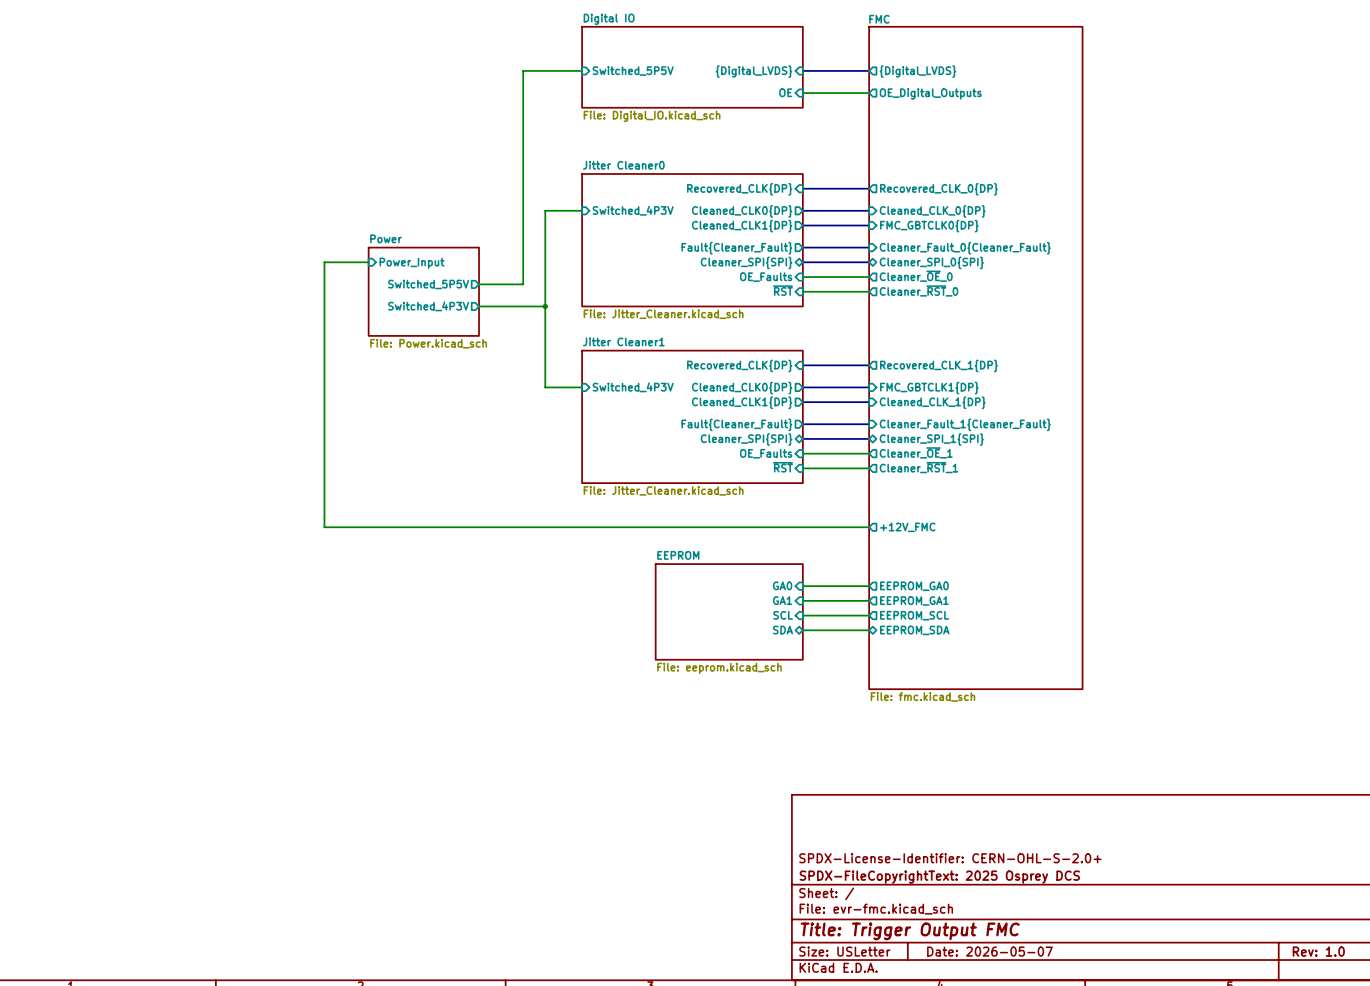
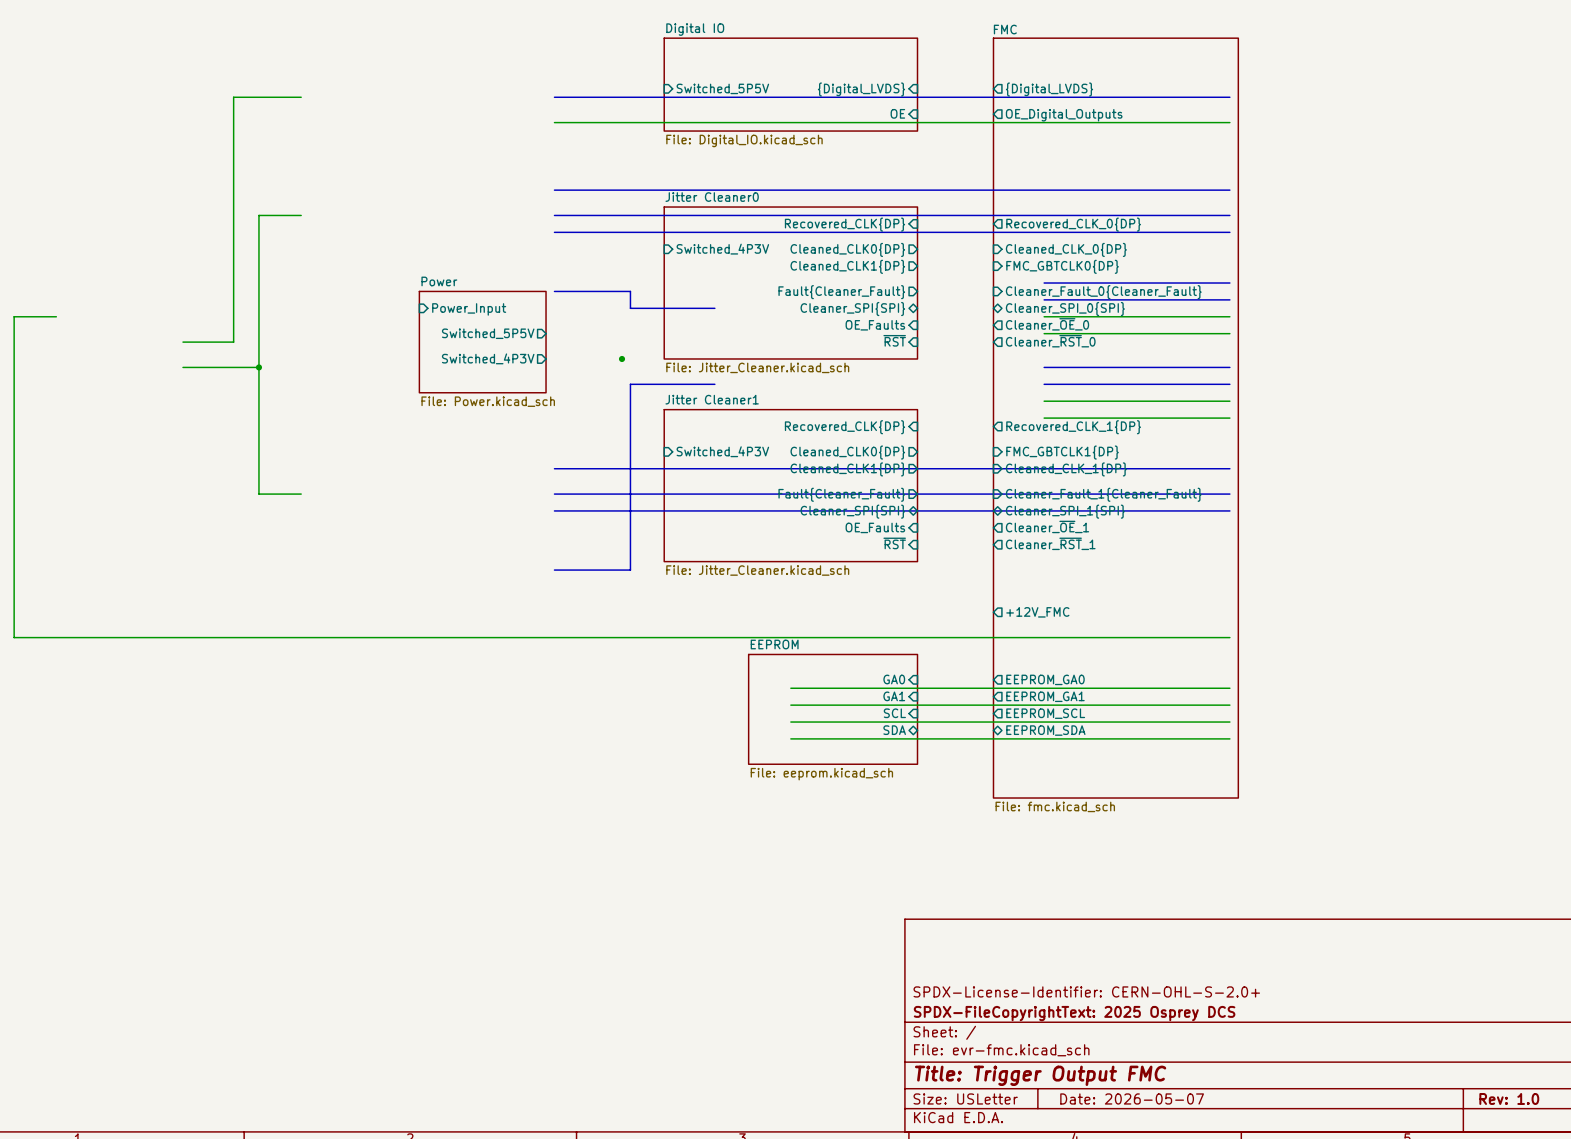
wire: (582, 70) (523, 70) (523, 284) (479, 284) -> none
bus: (802, 70) (869, 70) -> none
wire: none -> (301, 97) (233, 97) (233, 342) (182, 342)
bus: none -> (554, 97) (1229, 97)
wire: (802, 93) (869, 93) -> none
wire: none -> (554, 122) (1229, 122)
bus: none -> (554, 190) (1229, 190)
wire: none -> (301, 215) (258, 215) (258, 494) (301, 494)
bus: none -> (554, 215) (1229, 215)
bus: (802, 188) (869, 188) -> none
bus: none -> (554, 232) (1229, 232)
wire: (582, 210) (545, 210) (545, 387) (582, 387) -> none
bus: (802, 210) (869, 210) -> none
bus: (802, 225) (869, 225) -> none
bus: none -> (1044, 283) (1229, 283)
bus: none -> (554, 291) (630, 291) (630, 308) (714, 308)
bus: (802, 247) (869, 247) -> none
bus: none -> (1044, 299) (1229, 299)
wire: (368, 262) (324, 262) (324, 527) (869, 527) -> none
bus: (802, 262) (869, 262) -> none
wire: none -> (56, 316) (14, 316) (14, 637) (1229, 637)
wire: none -> (1044, 316) (1229, 316)
wire: (802, 277) (869, 277) -> none
wire: none -> (1044, 333) (1229, 333)
wire: (802, 291) (869, 291) -> none
wire: (479, 306) (545, 306) -> none
wire: none -> (182, 367) (258, 367)
junction: none -> (258, 367)
bus: none -> (1044, 367) (1229, 367)
bus: none -> (714, 384) (630, 384) (630, 570) (554, 570)
bus: none -> (1044, 384) (1229, 384)
wire: none -> (1044, 401) (1229, 401)
wire: none -> (1044, 418) (1229, 418)
bus: (802, 365) (869, 365) -> none
bus: (802, 387) (869, 387) -> none
bus: none -> (554, 468) (917, 468)
bus: none -> (993, 468) (1229, 468)
bus: none -> (554, 494) (917, 494)
bus: none -> (993, 494) (1229, 494)
bus: none -> (554, 510) (917, 510)
bus: none -> (993, 510) (1229, 510)
wire: (802, 453) (869, 453) -> none
wire: (802, 468) (869, 468) -> none
wire: (802, 586) (869, 586) -> none
wire: none -> (790, 688) (1229, 688)
wire: (802, 600) (869, 600) -> none
wire: none -> (790, 705) (1229, 705)
wire: (802, 615) (869, 615) -> none
wire: none -> (790, 722) (1229, 722)
wire: (802, 630) (869, 630) -> none
wire: none -> (790, 738) (1229, 738)

